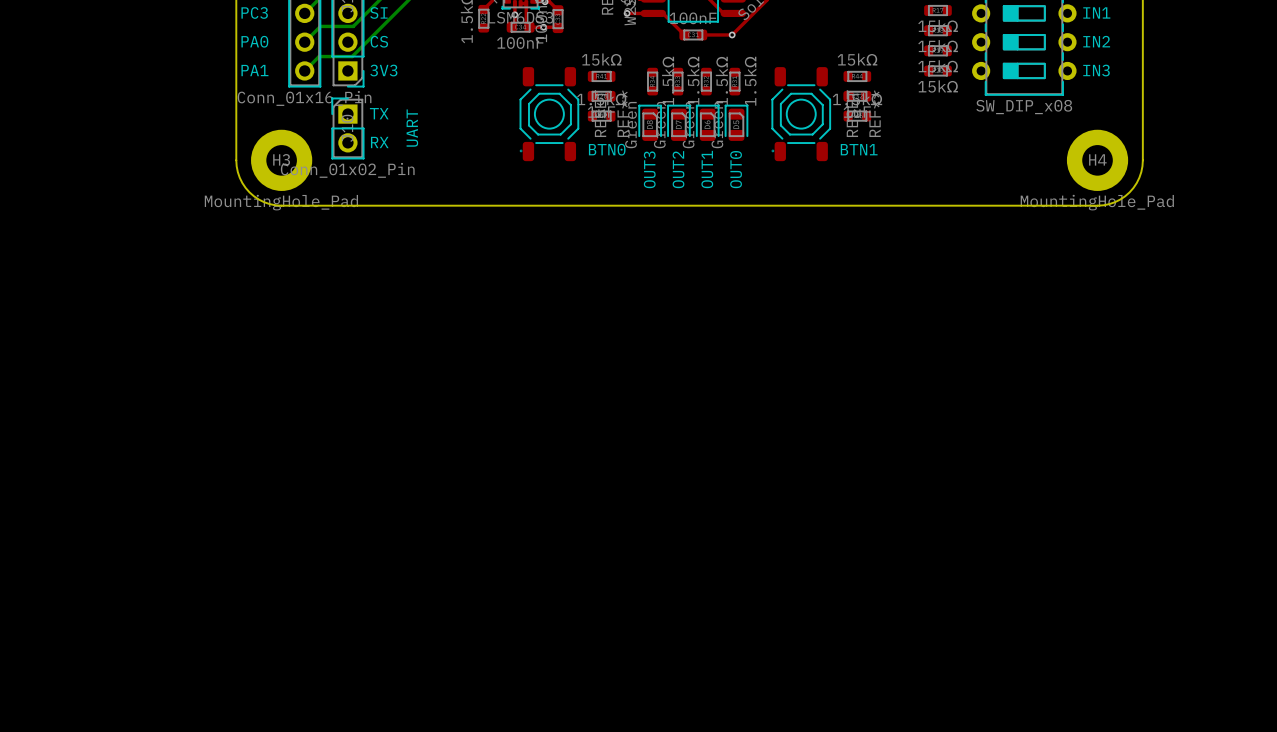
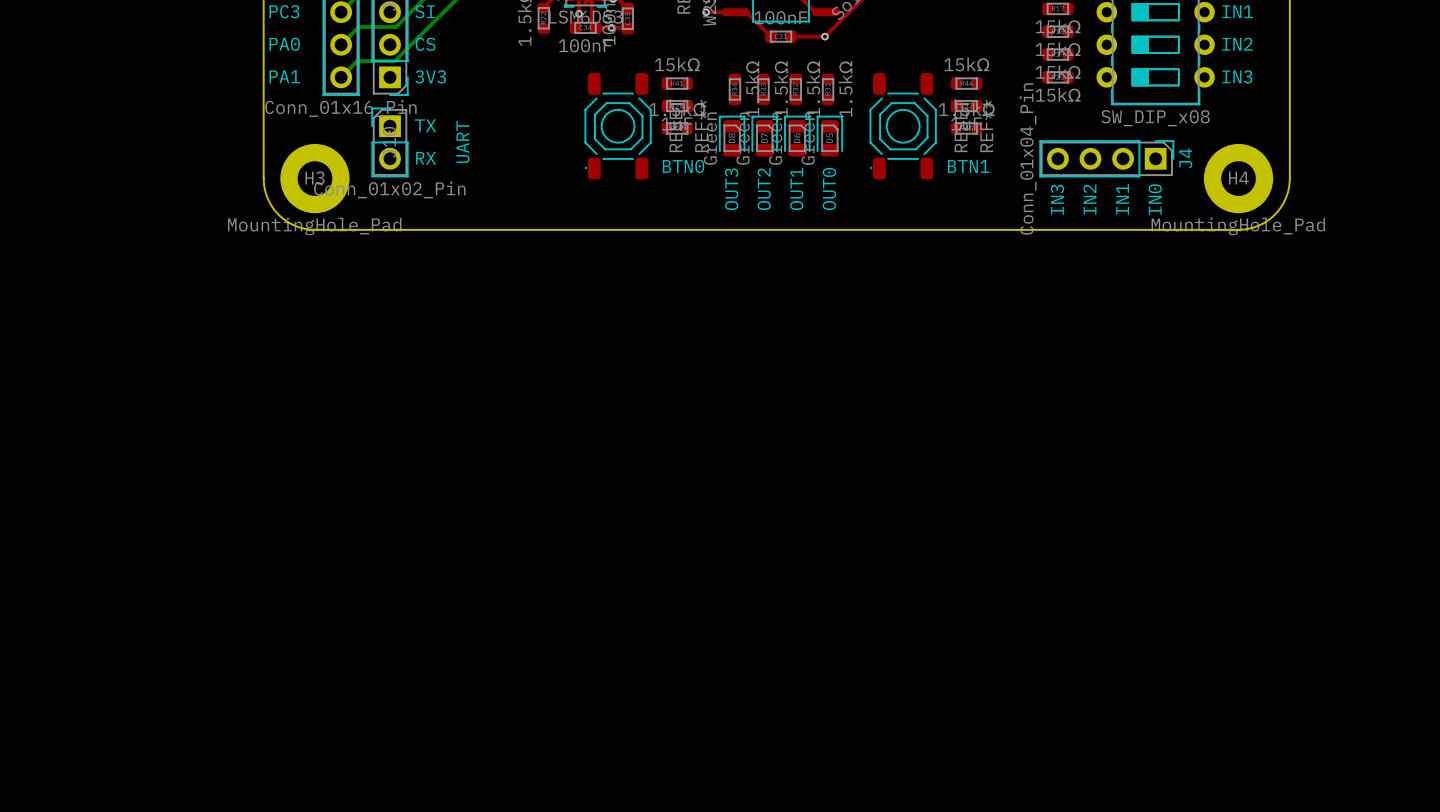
J4: none -> Conn_01x04_Pin (1106, 158)
text: none -> IN2 (1089, 199)
text: none -> IN1 (1122, 199)
text: none -> IN0 (1155, 199)
text: none -> IN3 (1057, 199)

